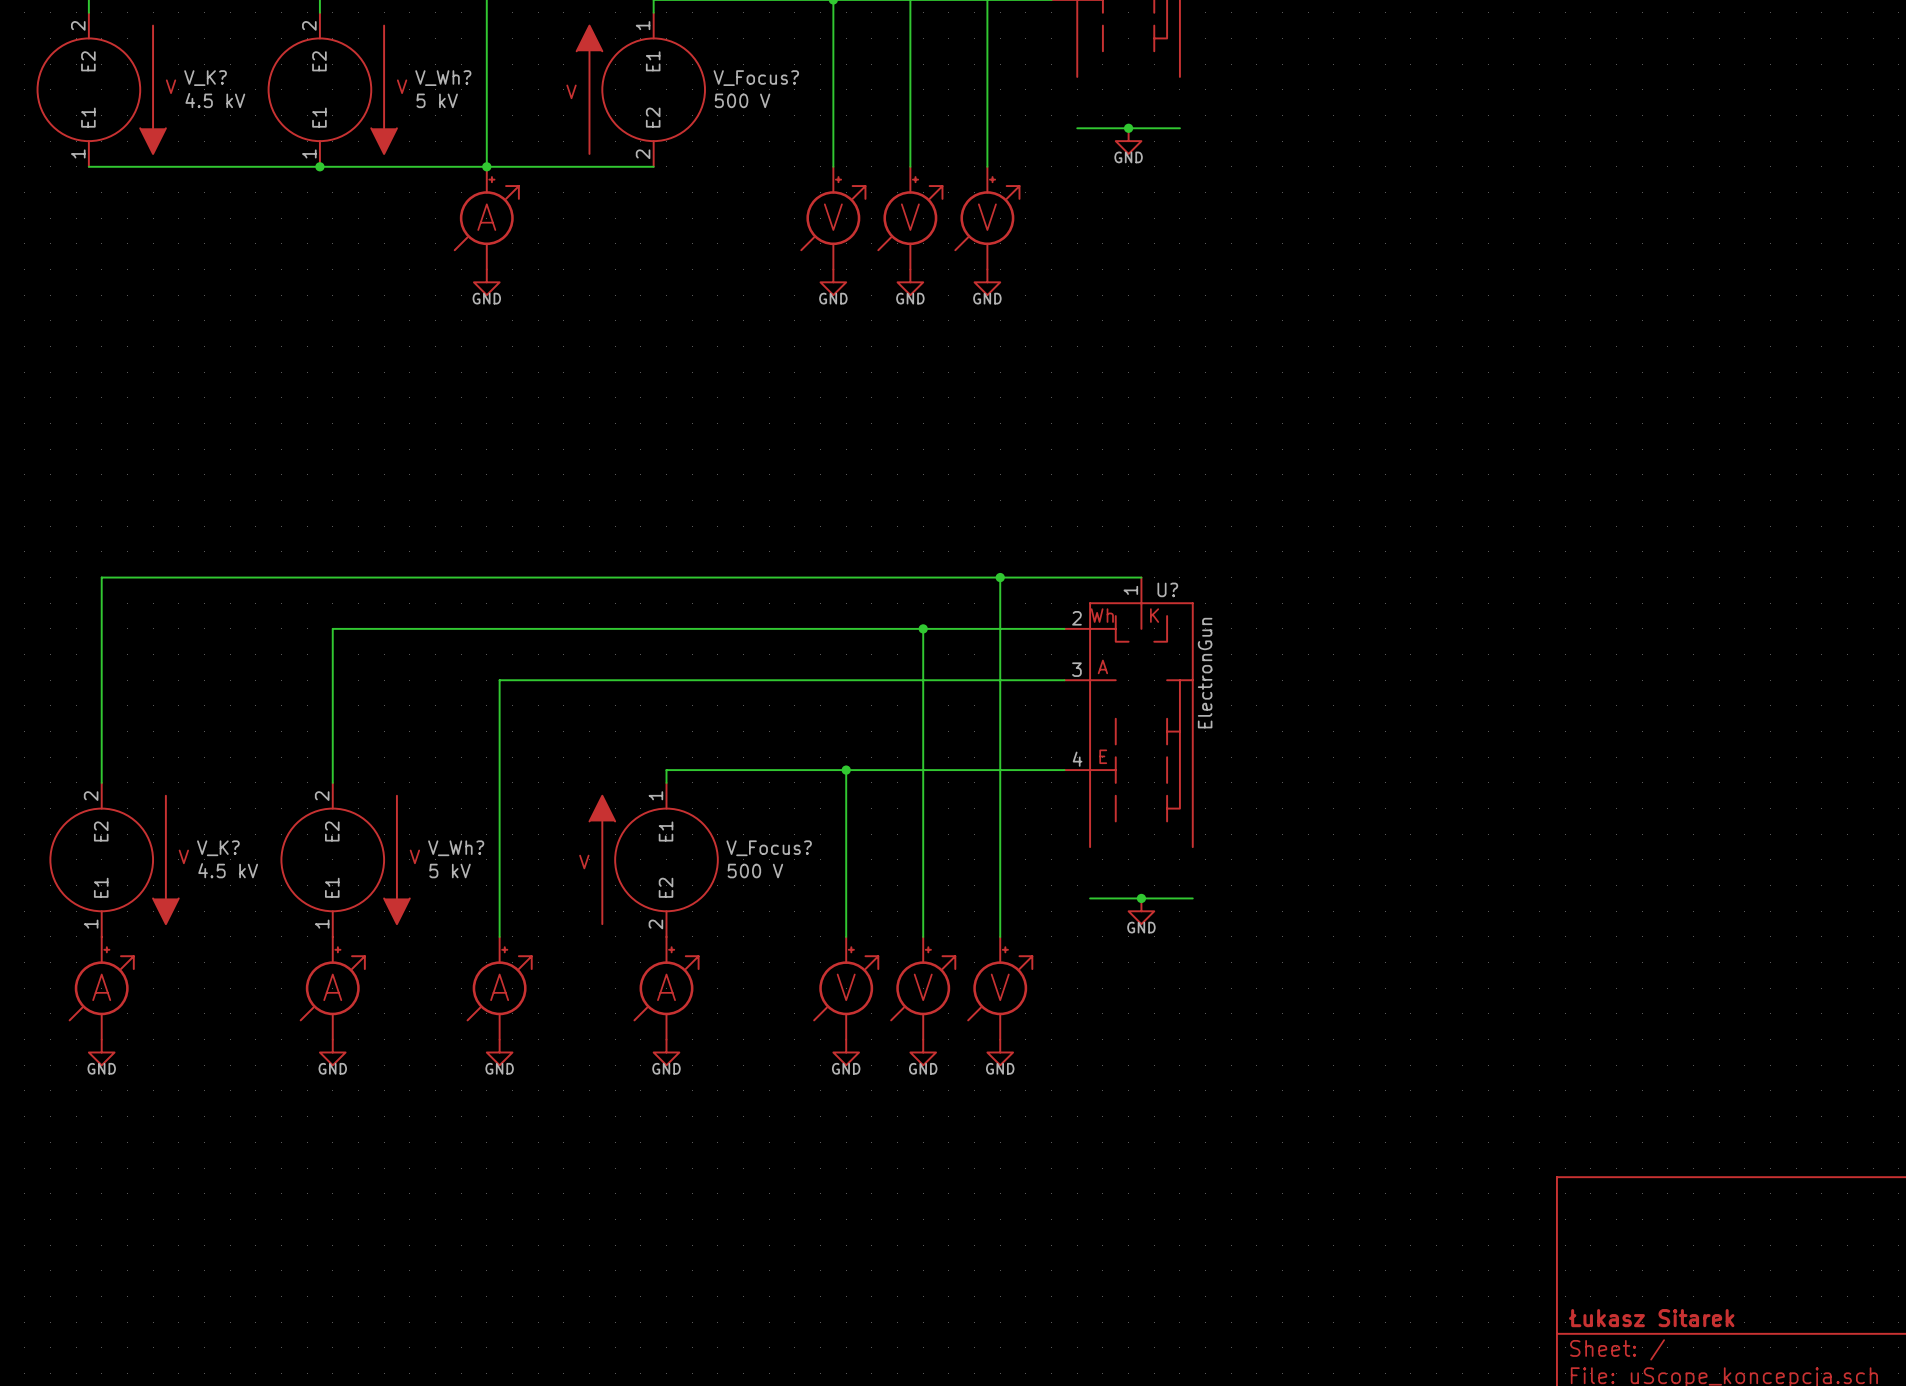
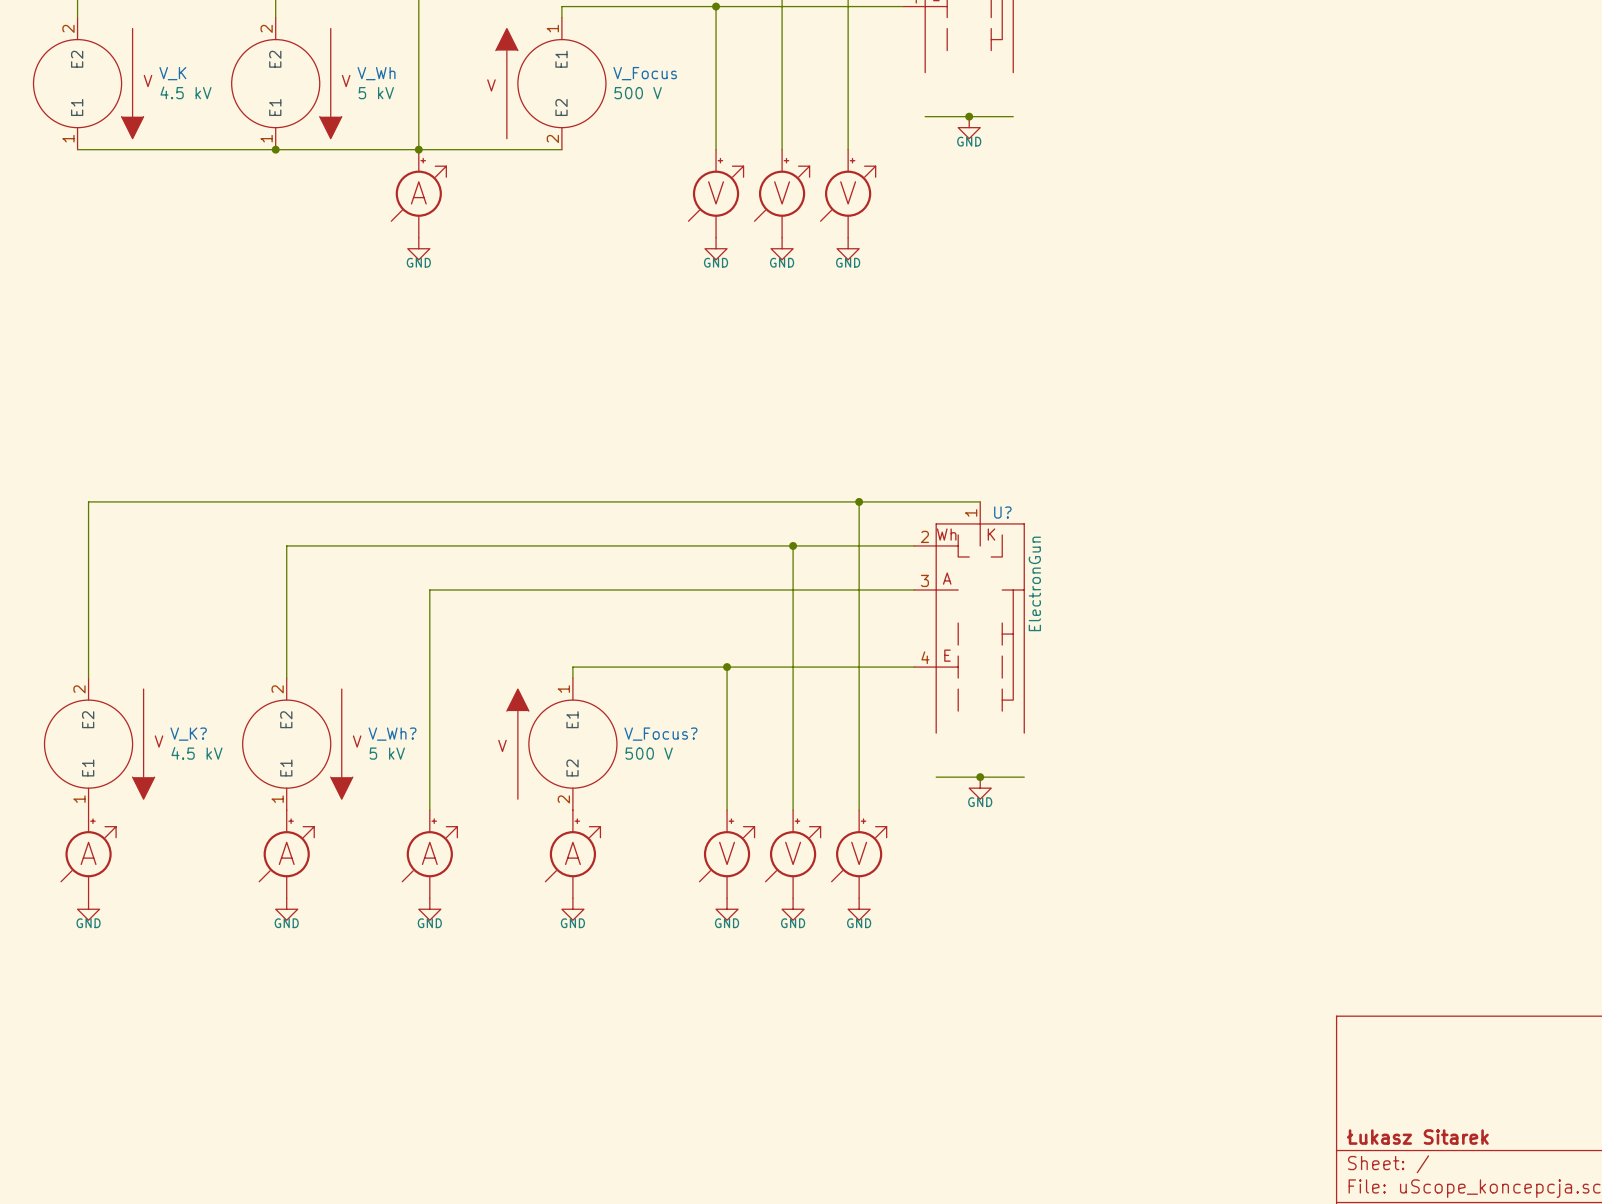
V_K? name: V_K? (205, 78) -> V_K (172, 73)
V_Wh? name: V_Wh? (443, 78) -> V_Wh (376, 73)
V_Focus? name: V_Focus? (756, 78) -> V_Focus (645, 73)

